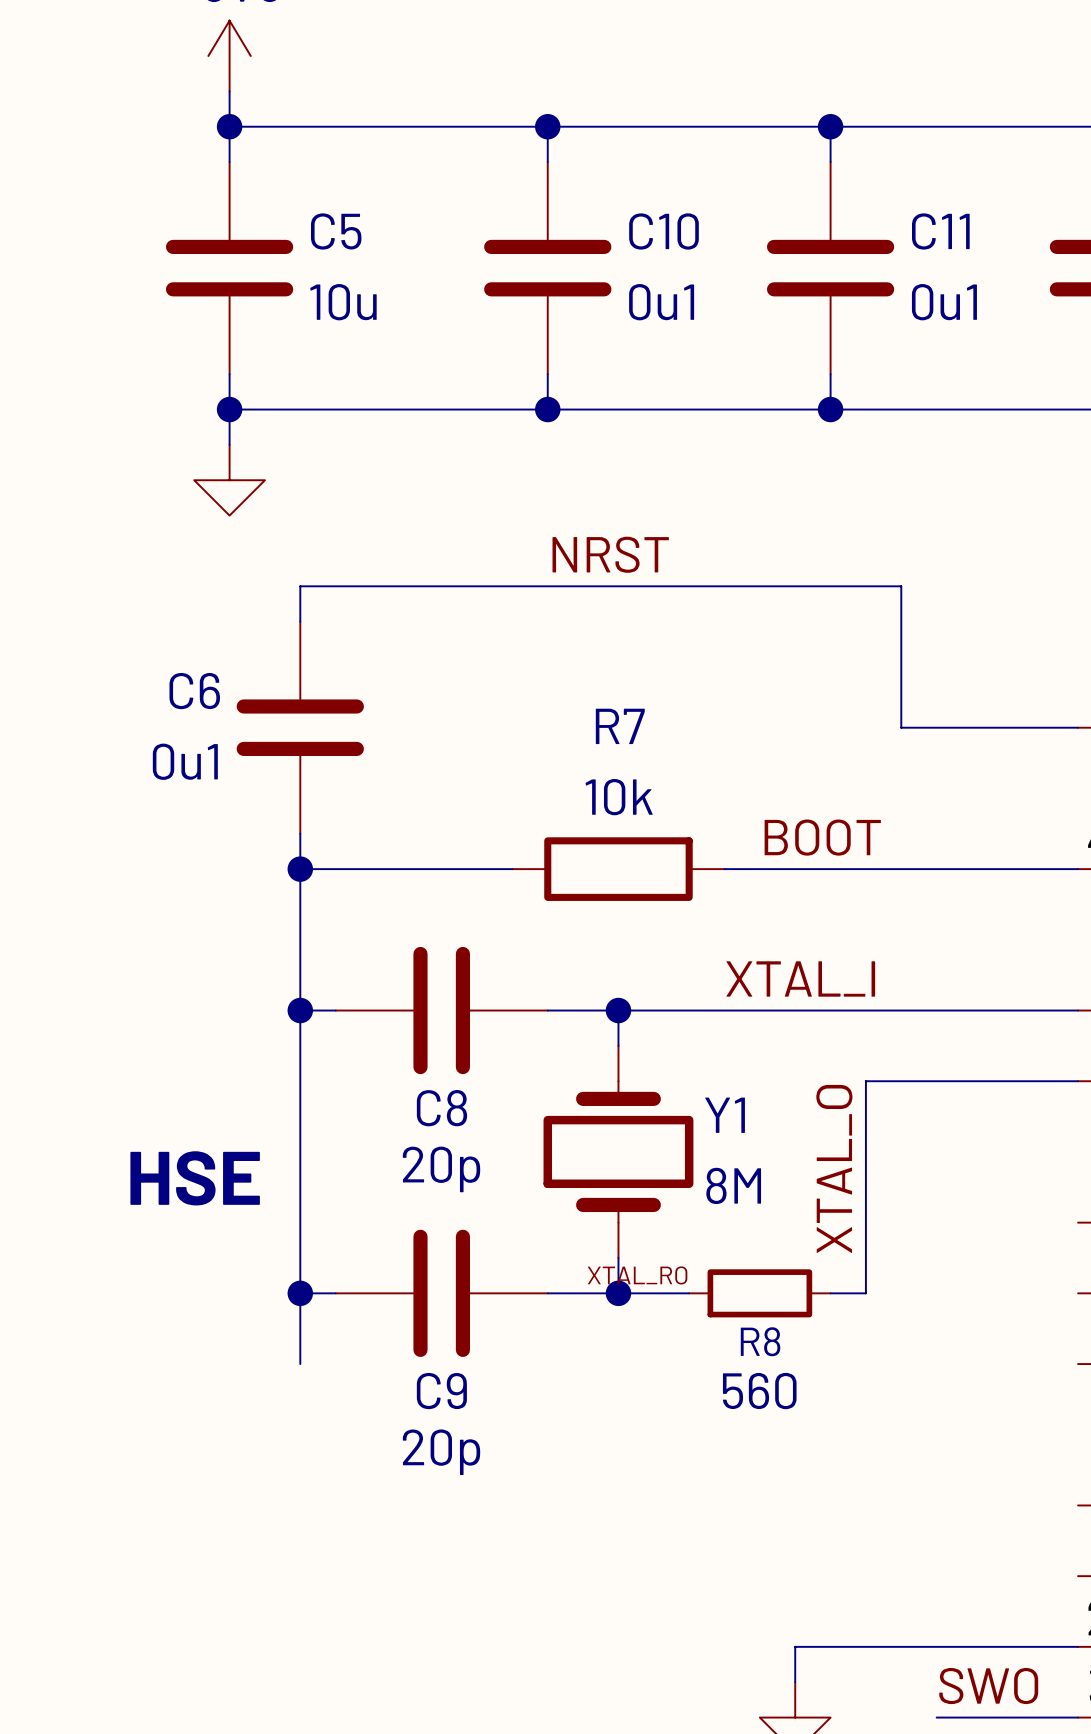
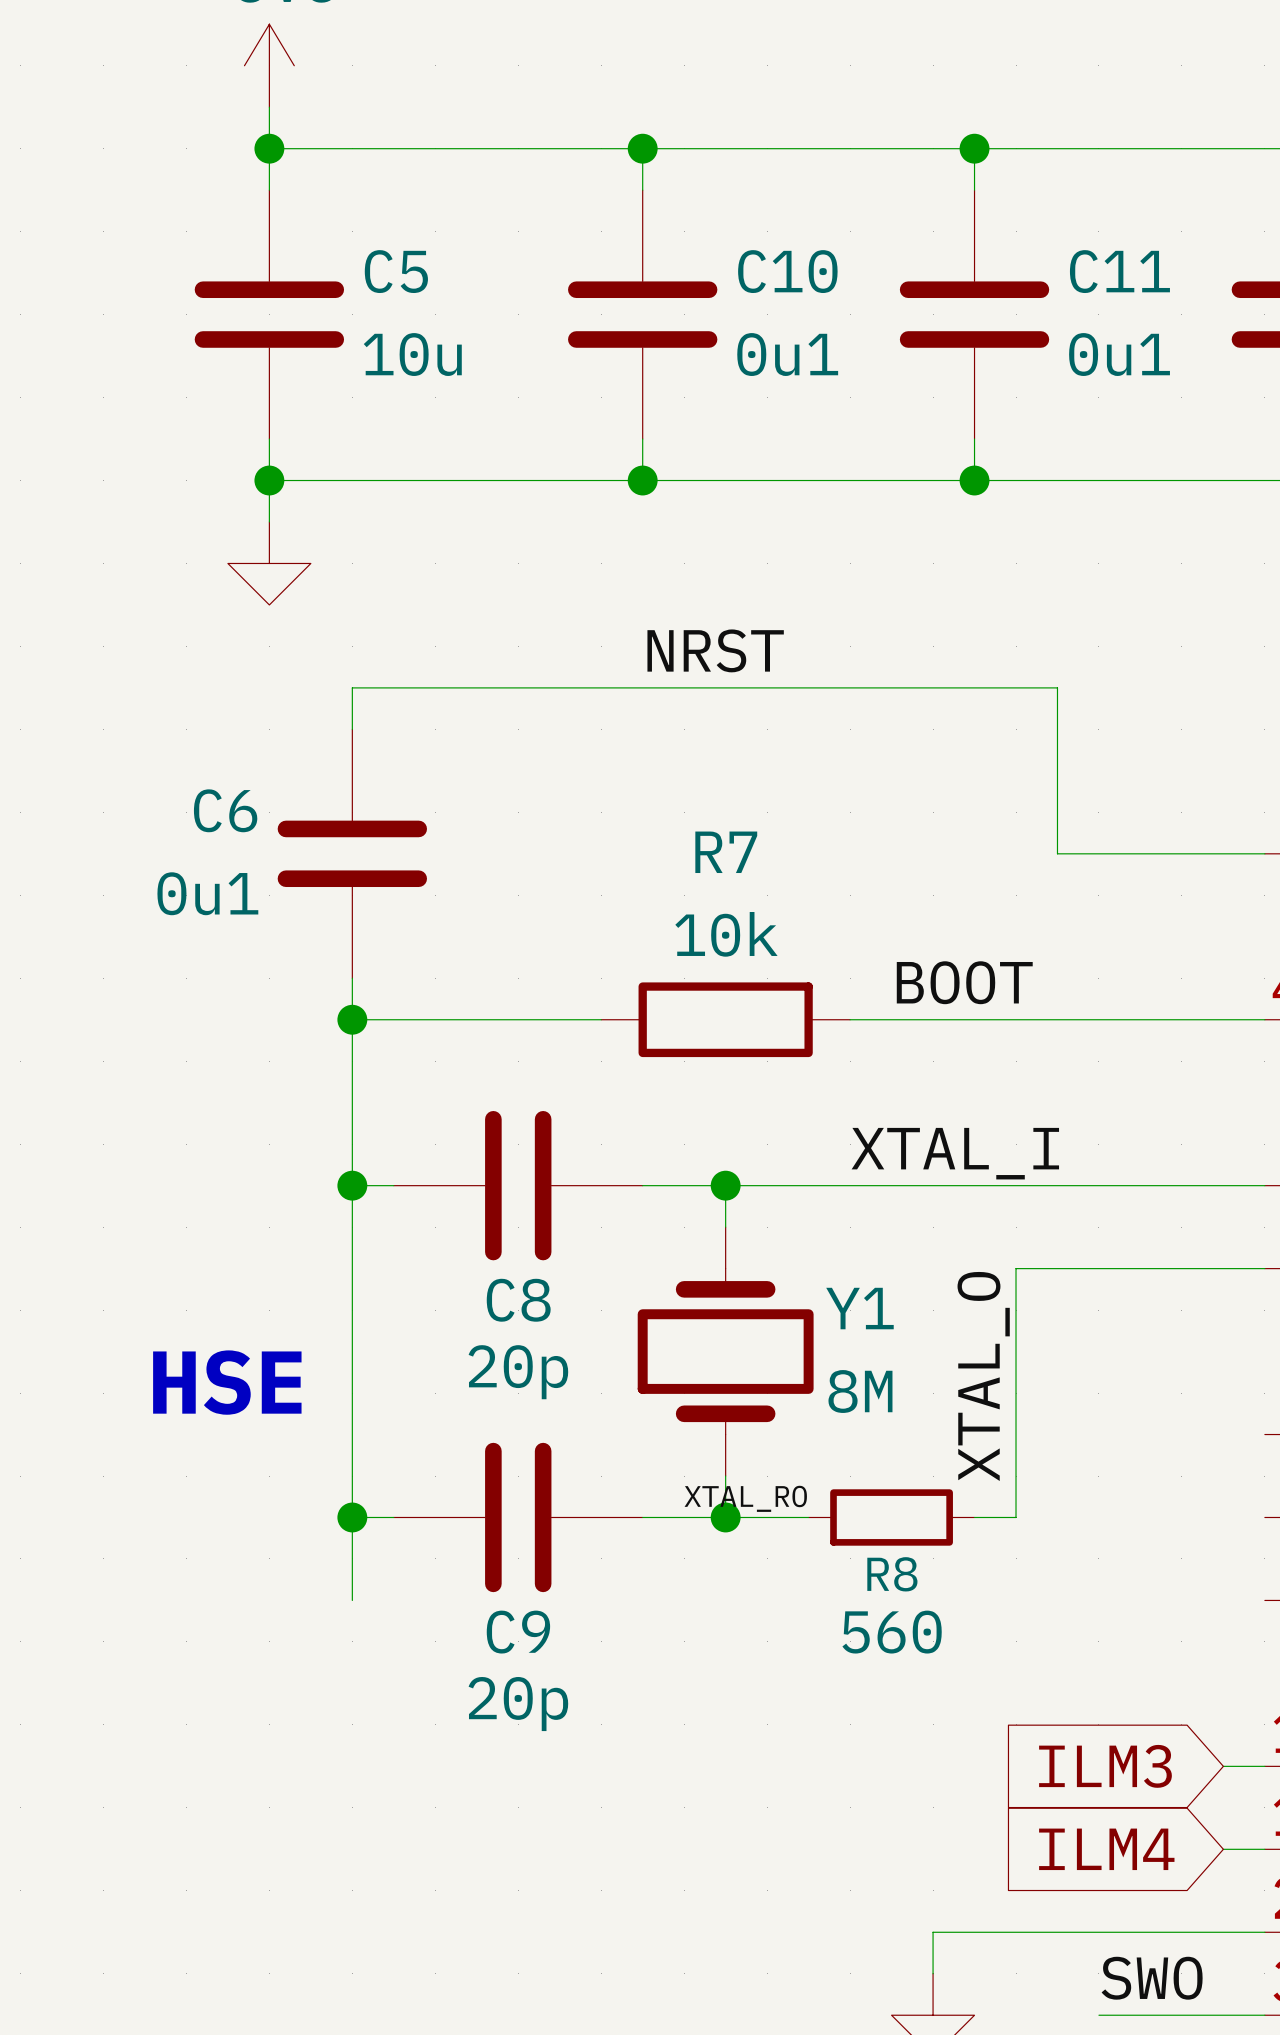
global label: none -> ILM3 (1105, 1766)
wire: none -> (1223, 1766) (1264, 1766)
global label: none -> ILM4 (1106, 1849)
wire: none -> (1223, 1849) (1264, 1849)

